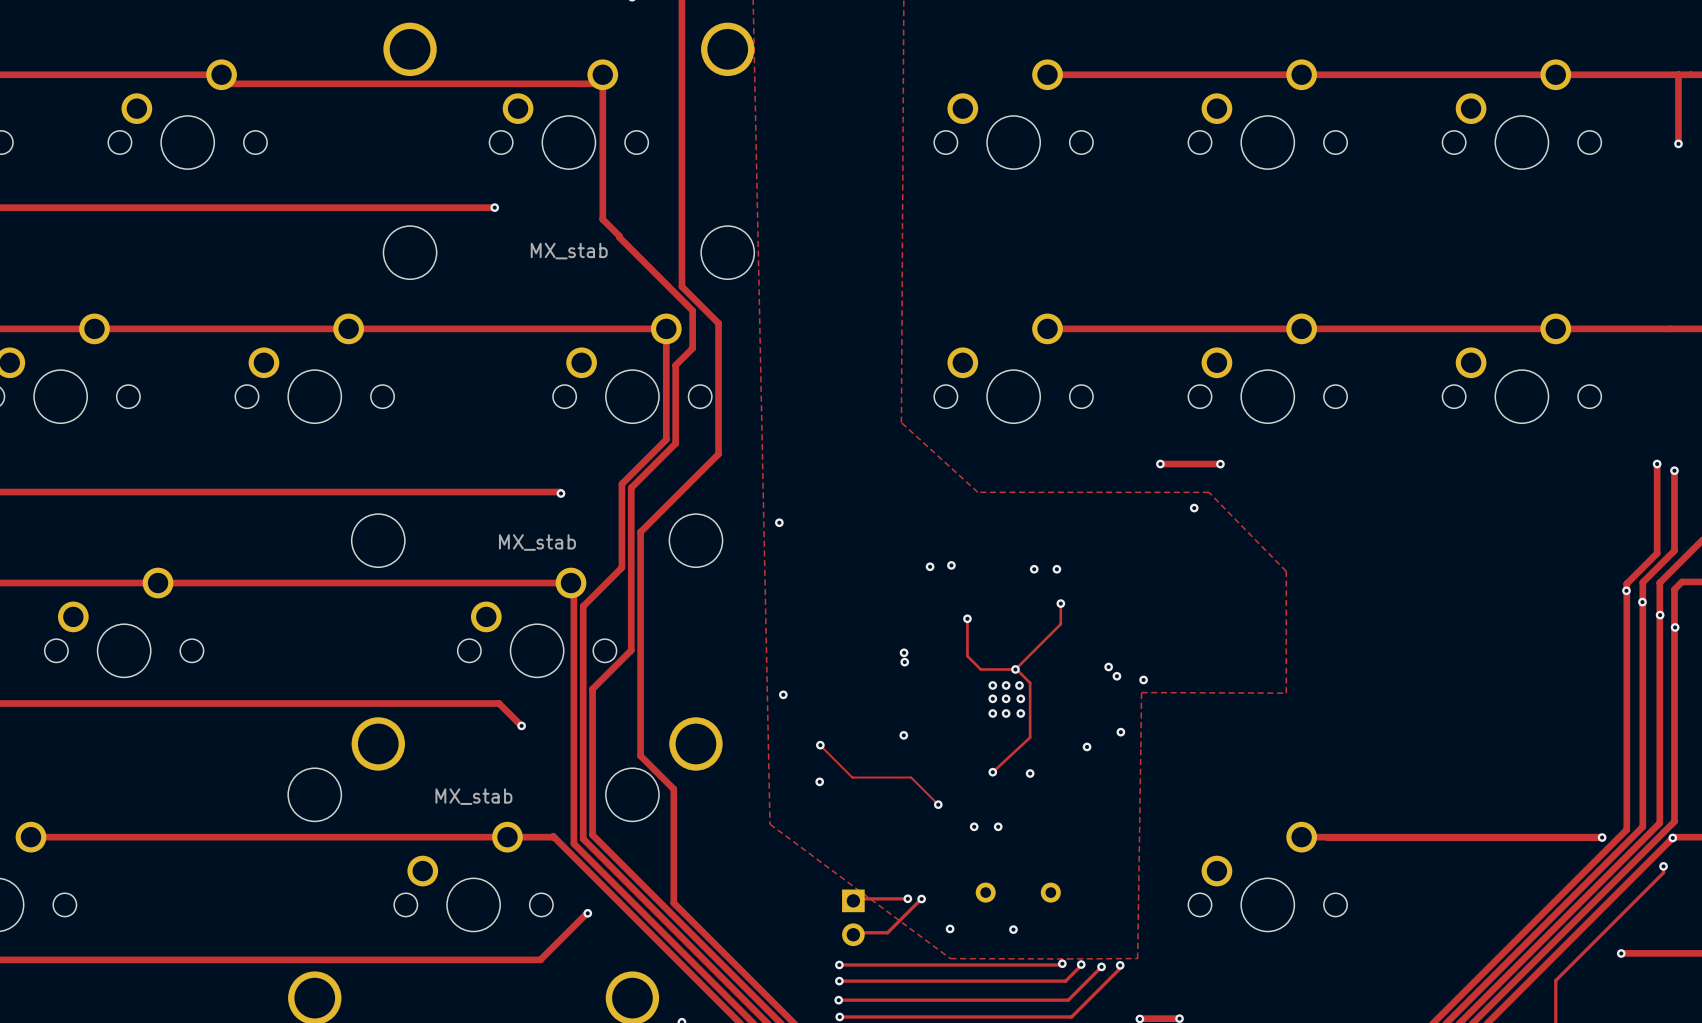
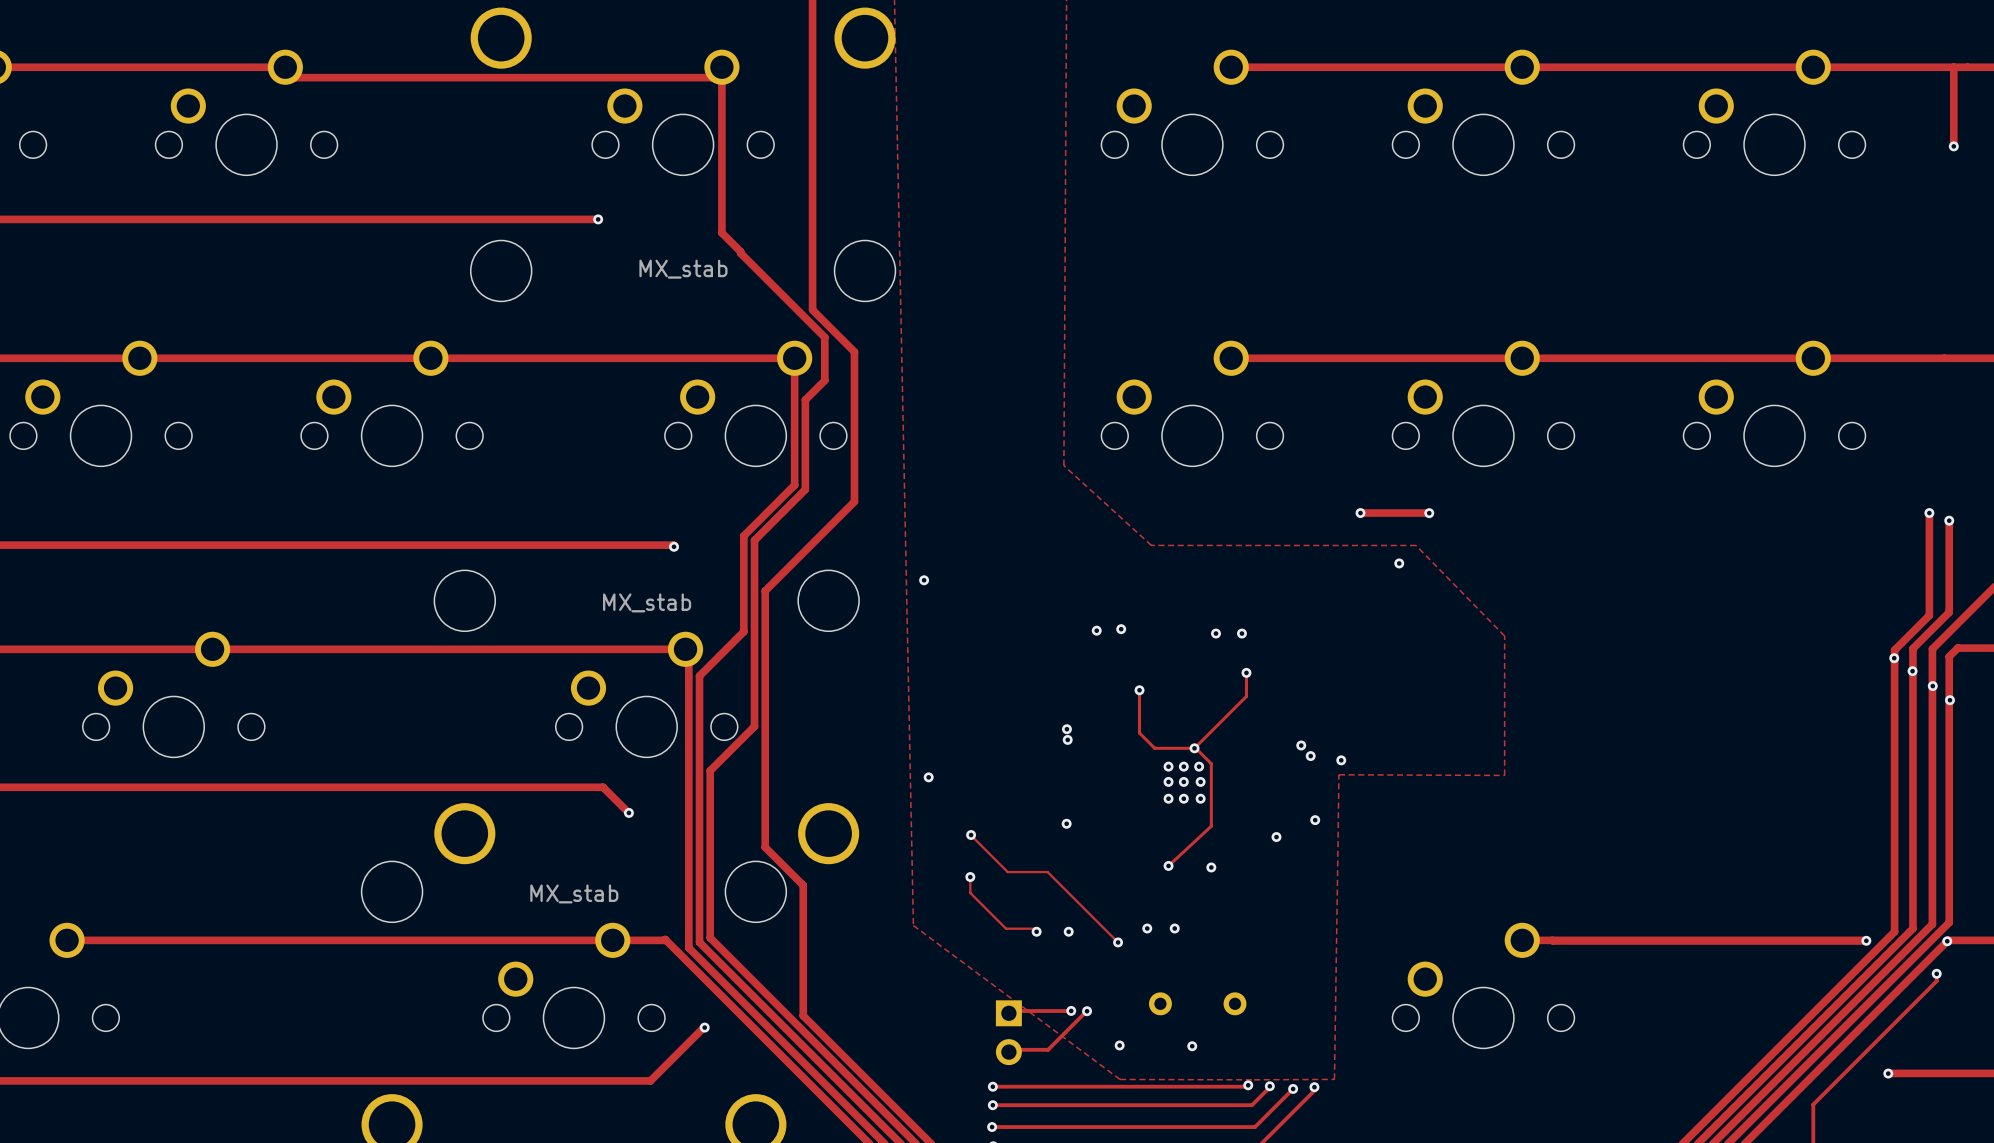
track: (887, 777) (911, 777) (938, 804) -> (1047, 872) (1118, 942)
track: none -> (970, 877) (970, 892) (1006, 928) (1035, 928) (1036, 931) (1036, 930)
via: (938, 804) -> none
via: none -> (1036, 931)
via: none -> (1068, 931)
via: none -> (1118, 942)

